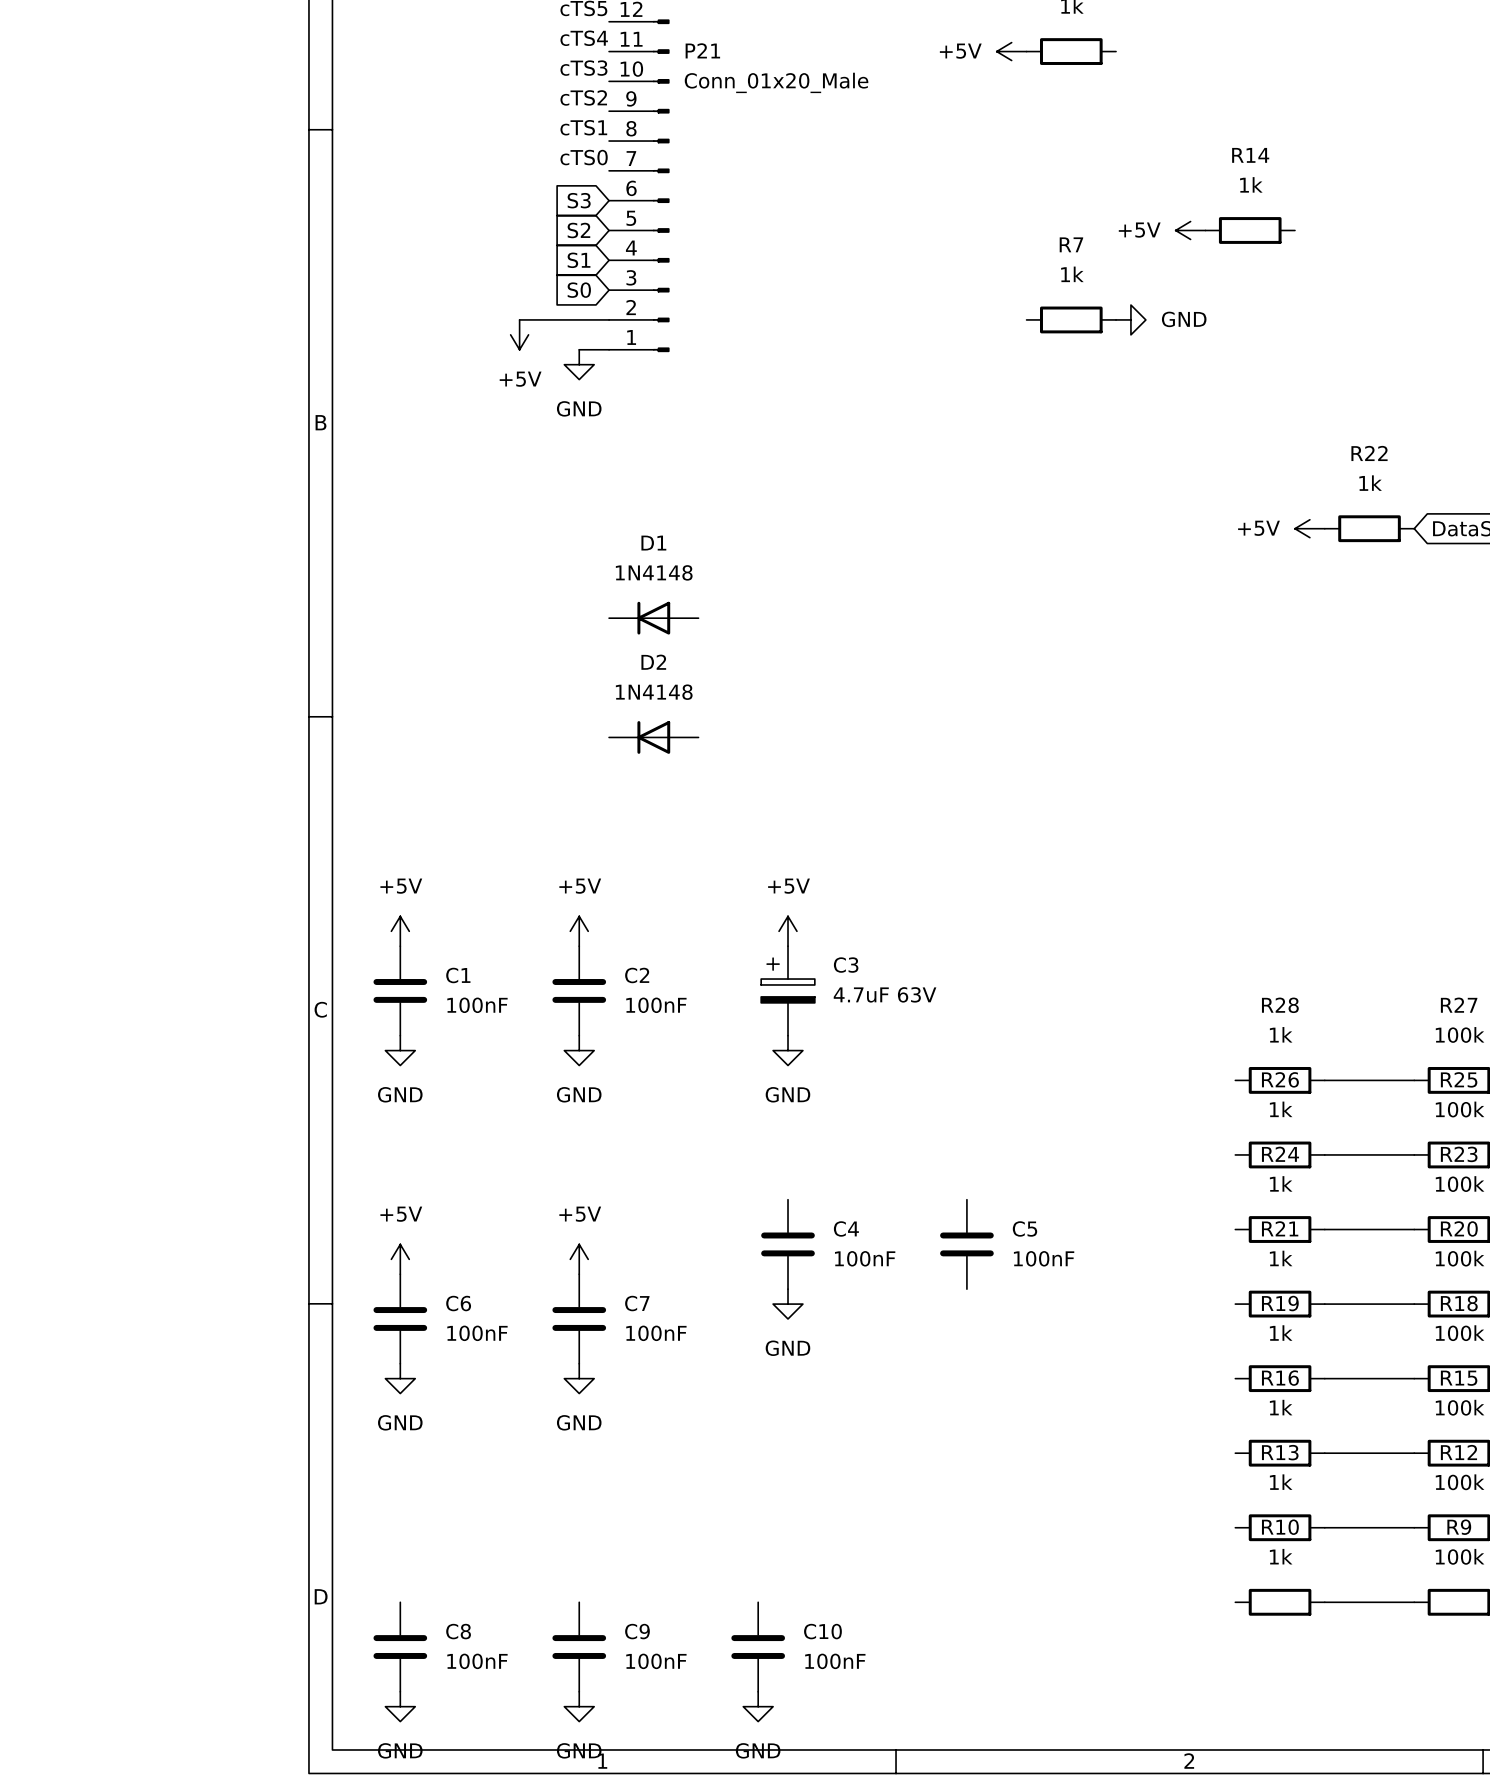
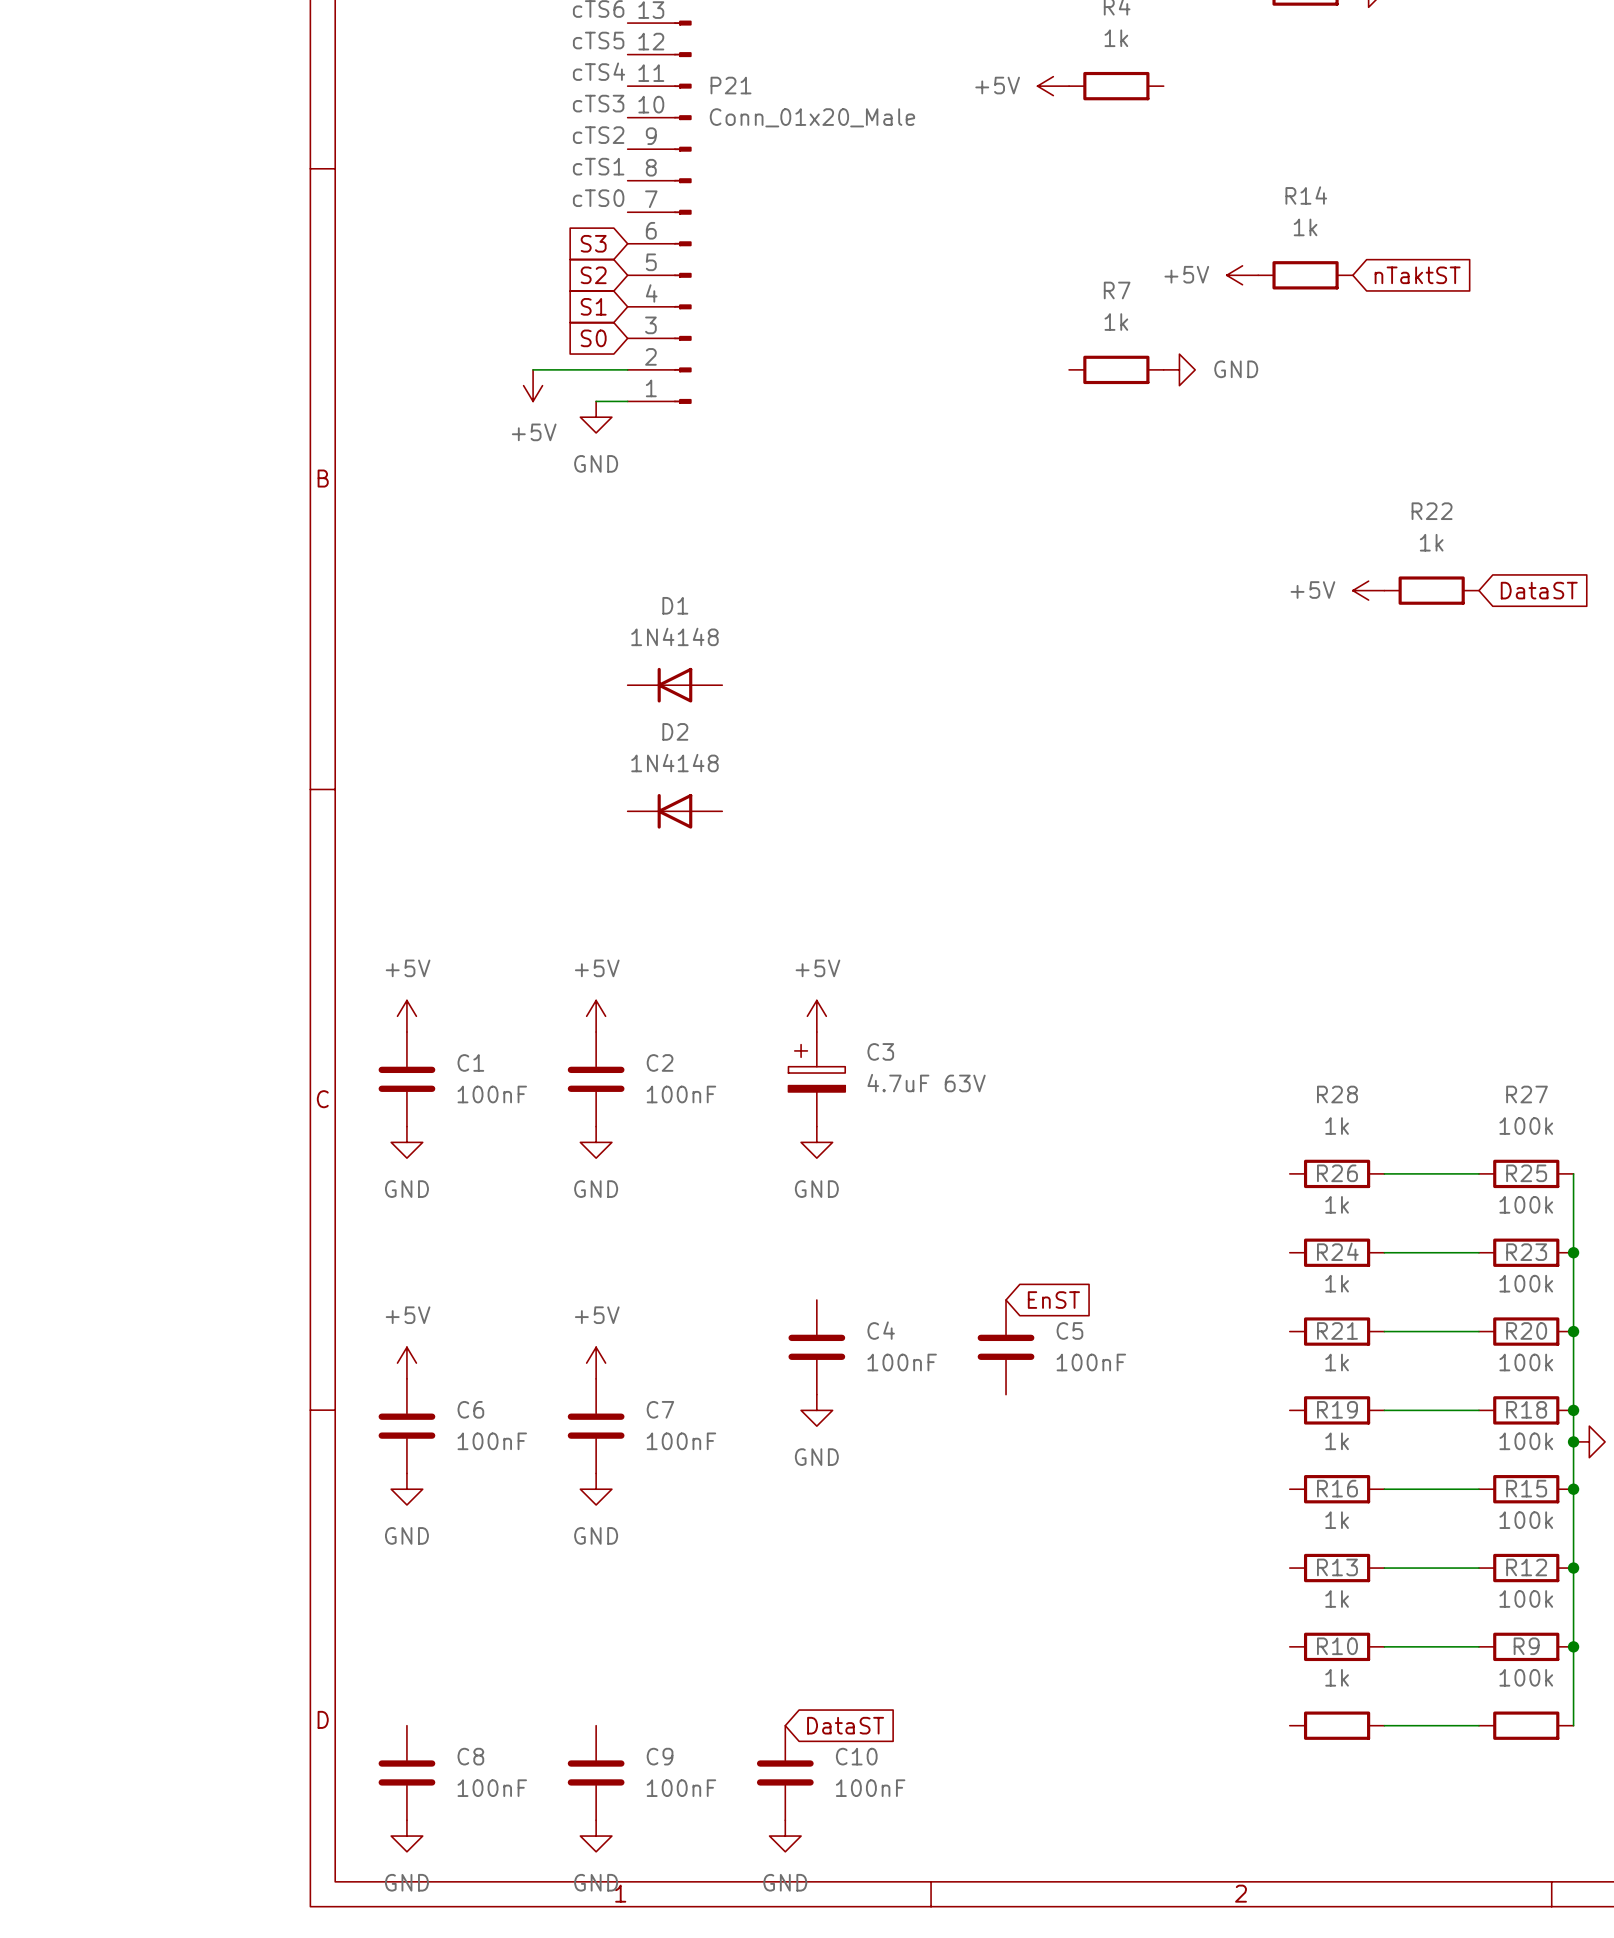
global label: none -> nTaktST (1417, 275)
global label: none -> EnST (1053, 1300)
global label: none -> DataST (845, 1725)

